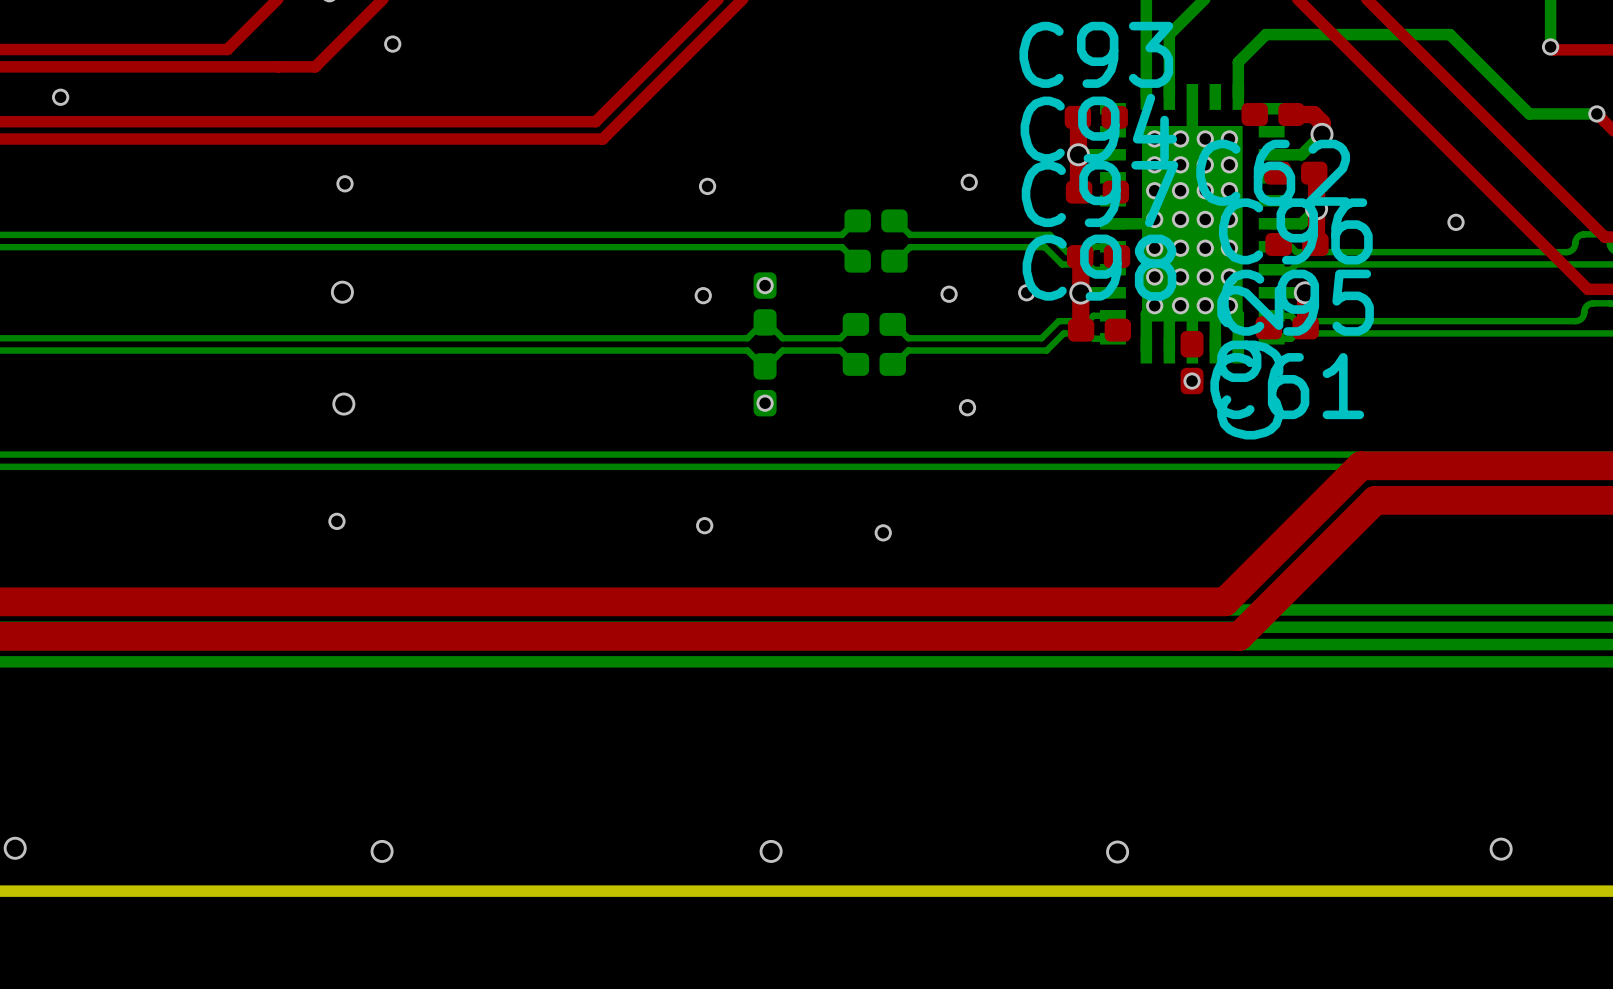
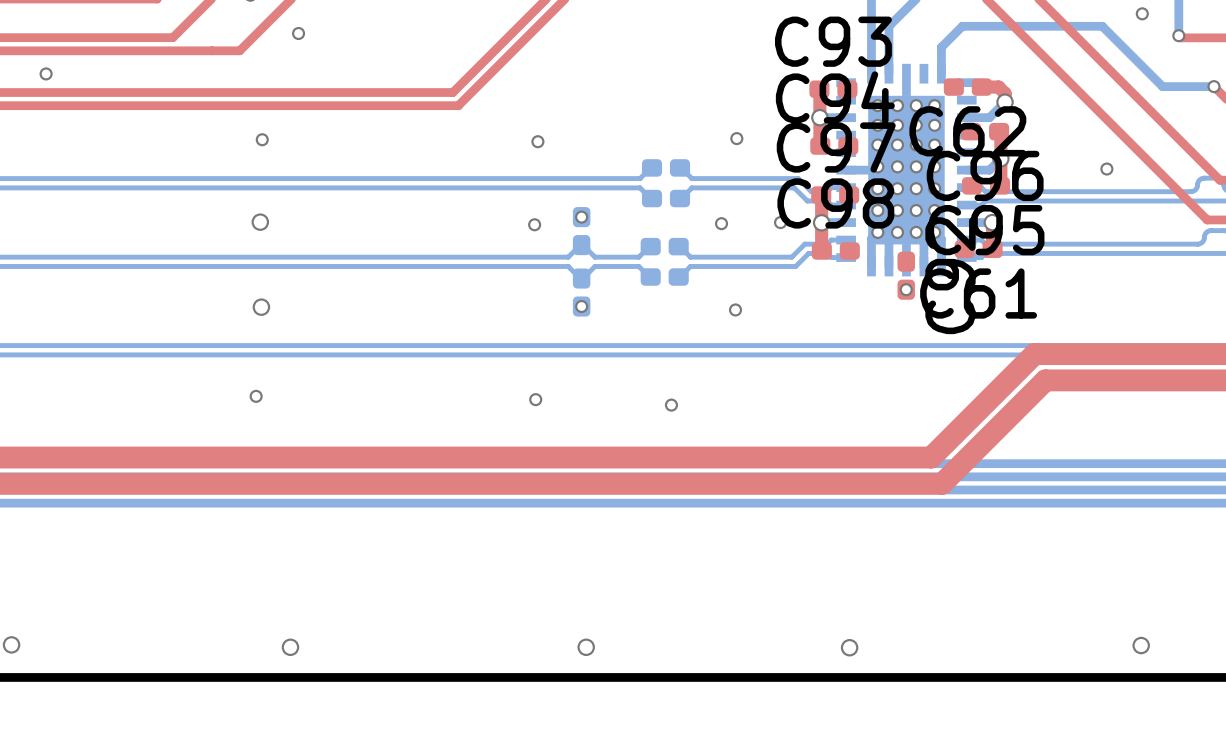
via: none -> (1142, 13)

